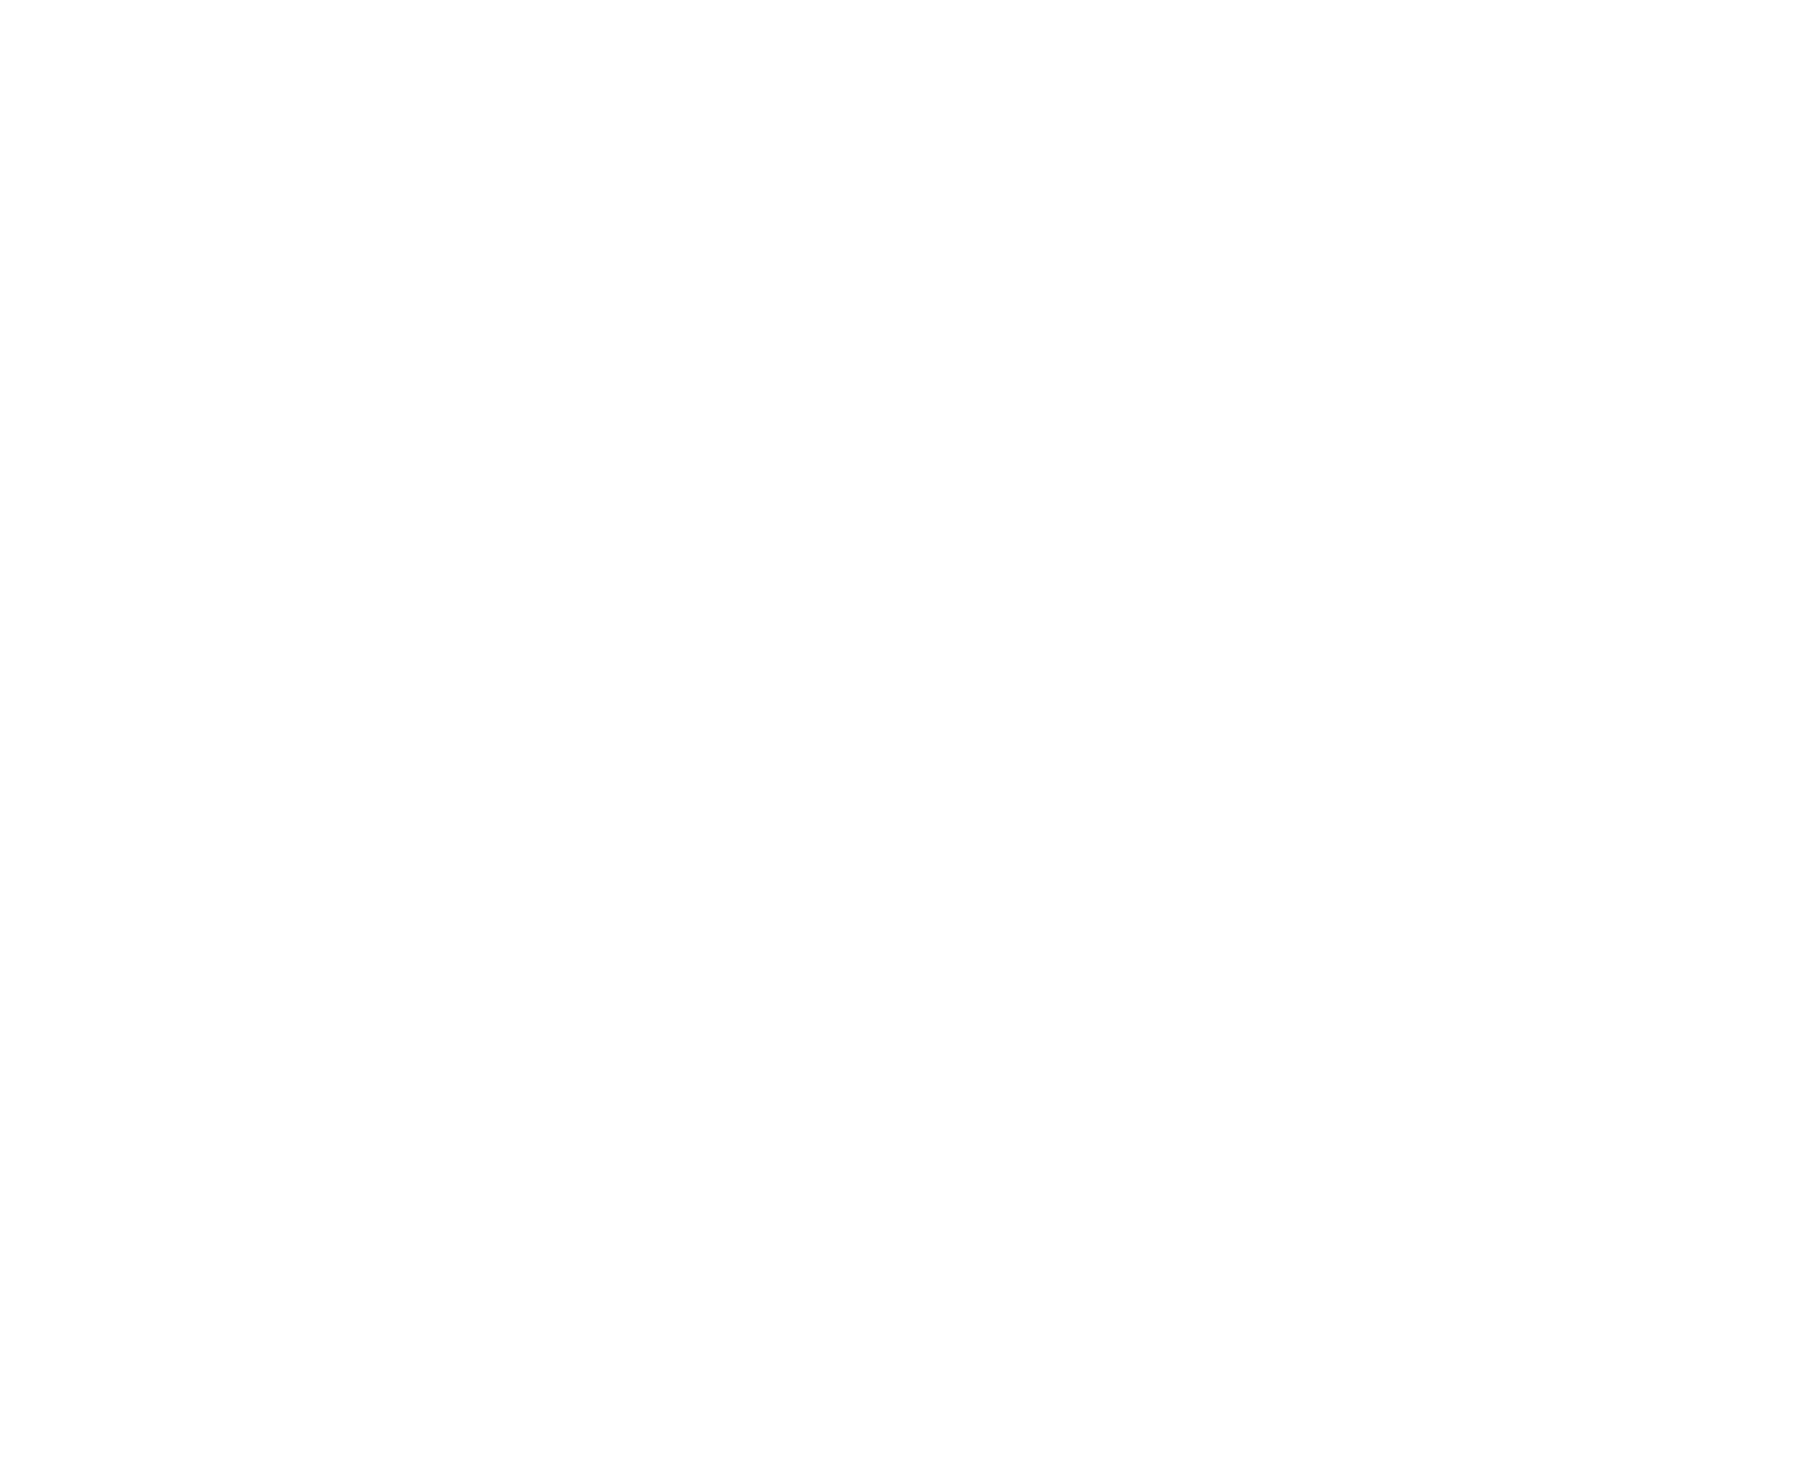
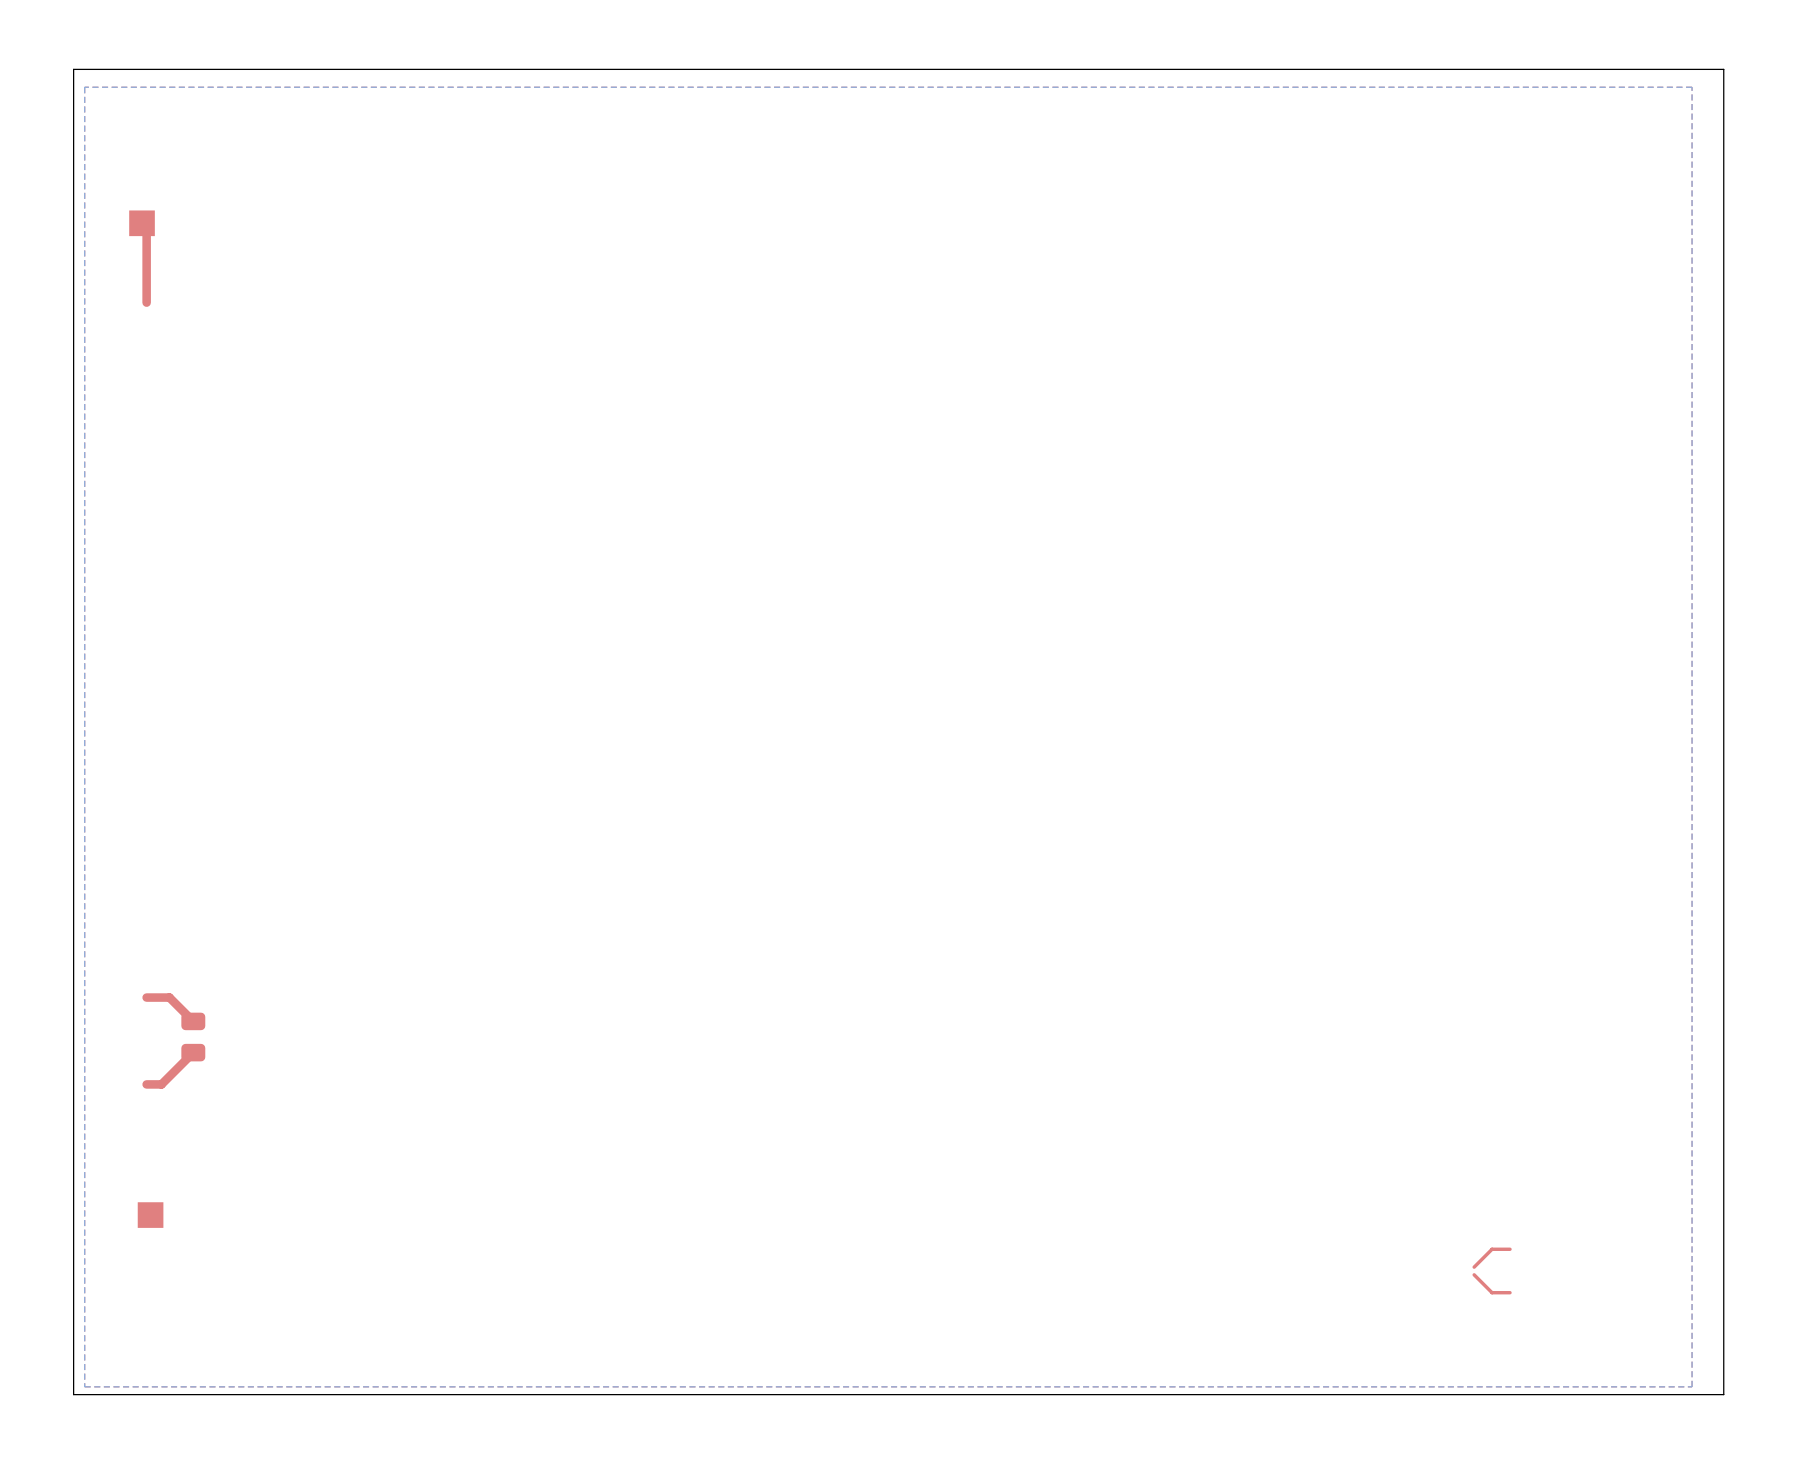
board edge: none -> (1723, 69) (73, 69) (73, 1394) (1723, 1394) (1723, 69)
bottom zone outline: none -> (1692, 87) (84, 87) (84, 1386) (1692, 1386) (1692, 87)
top track: none -> (142, 223) (146, 227) (146, 302)
part: none -> (142, 223)
top track: none -> (146, 997) (169, 997) (193, 1021)
part: none -> (193, 1037)
top track: none -> (193, 1052) (161, 1084) (146, 1084)
part: none -> (150, 1215)
top track: none -> (1510, 1249) (1492, 1249) (1474, 1267)
top track: none -> (1474, 1274) (1492, 1292) (1510, 1292)

